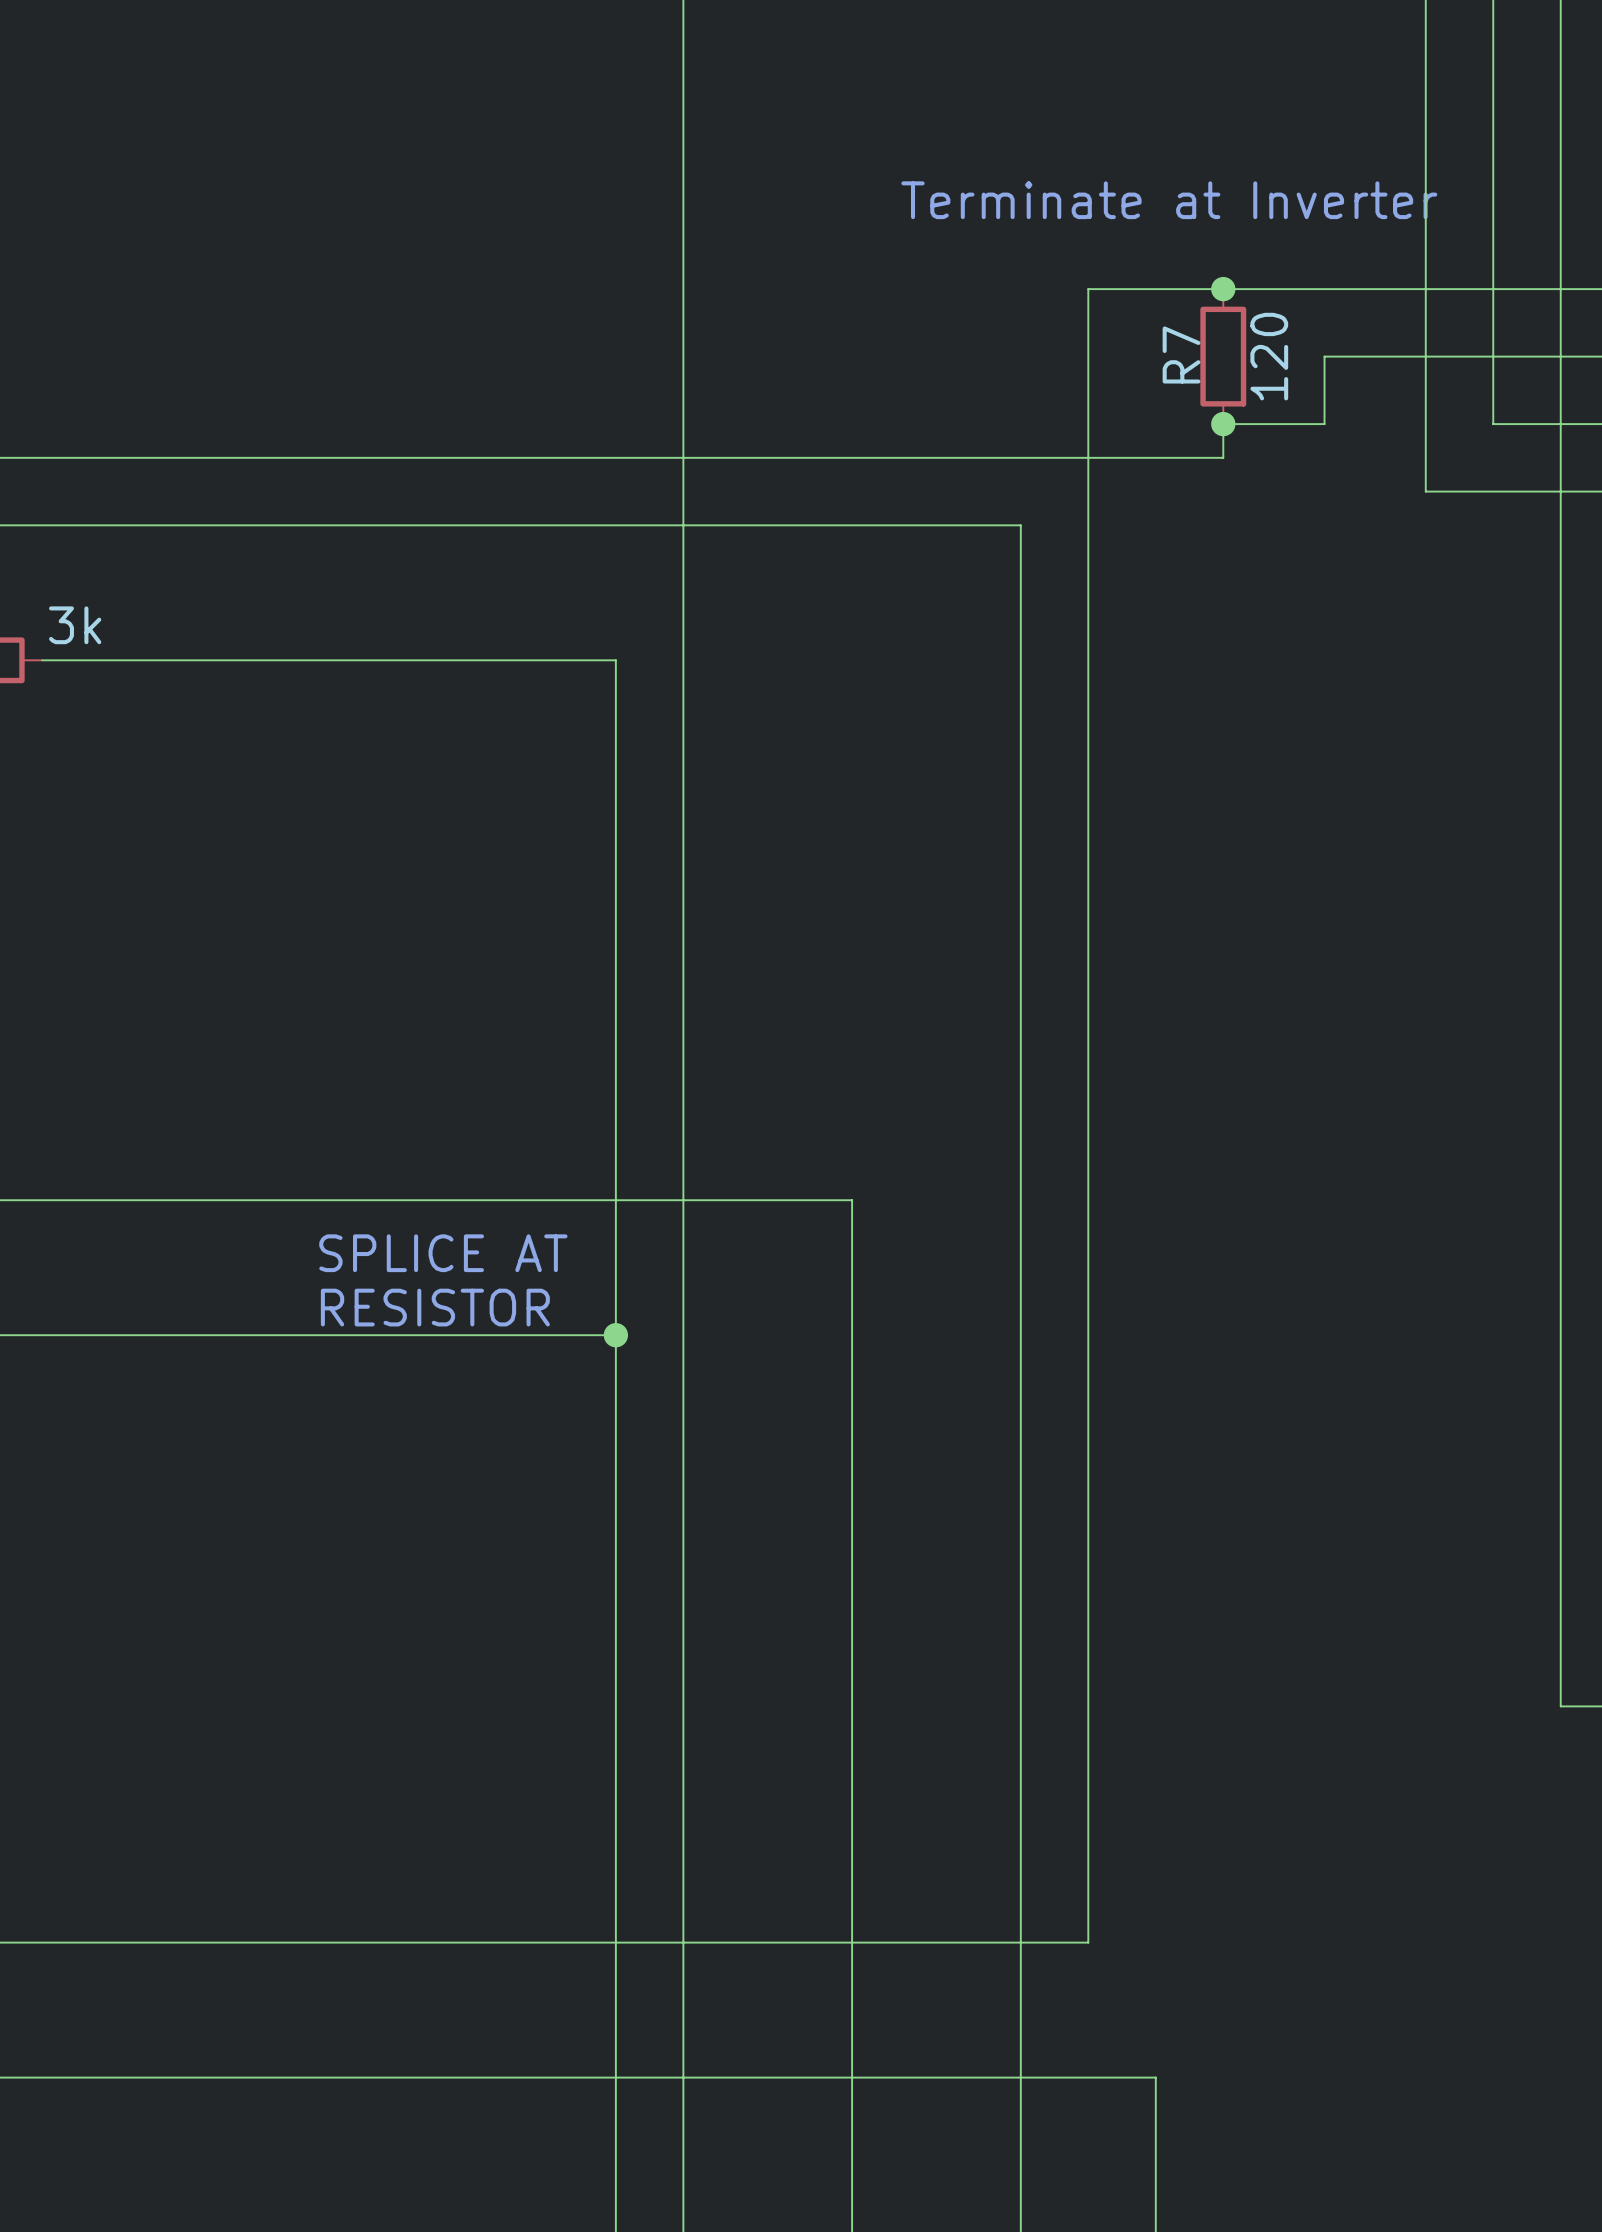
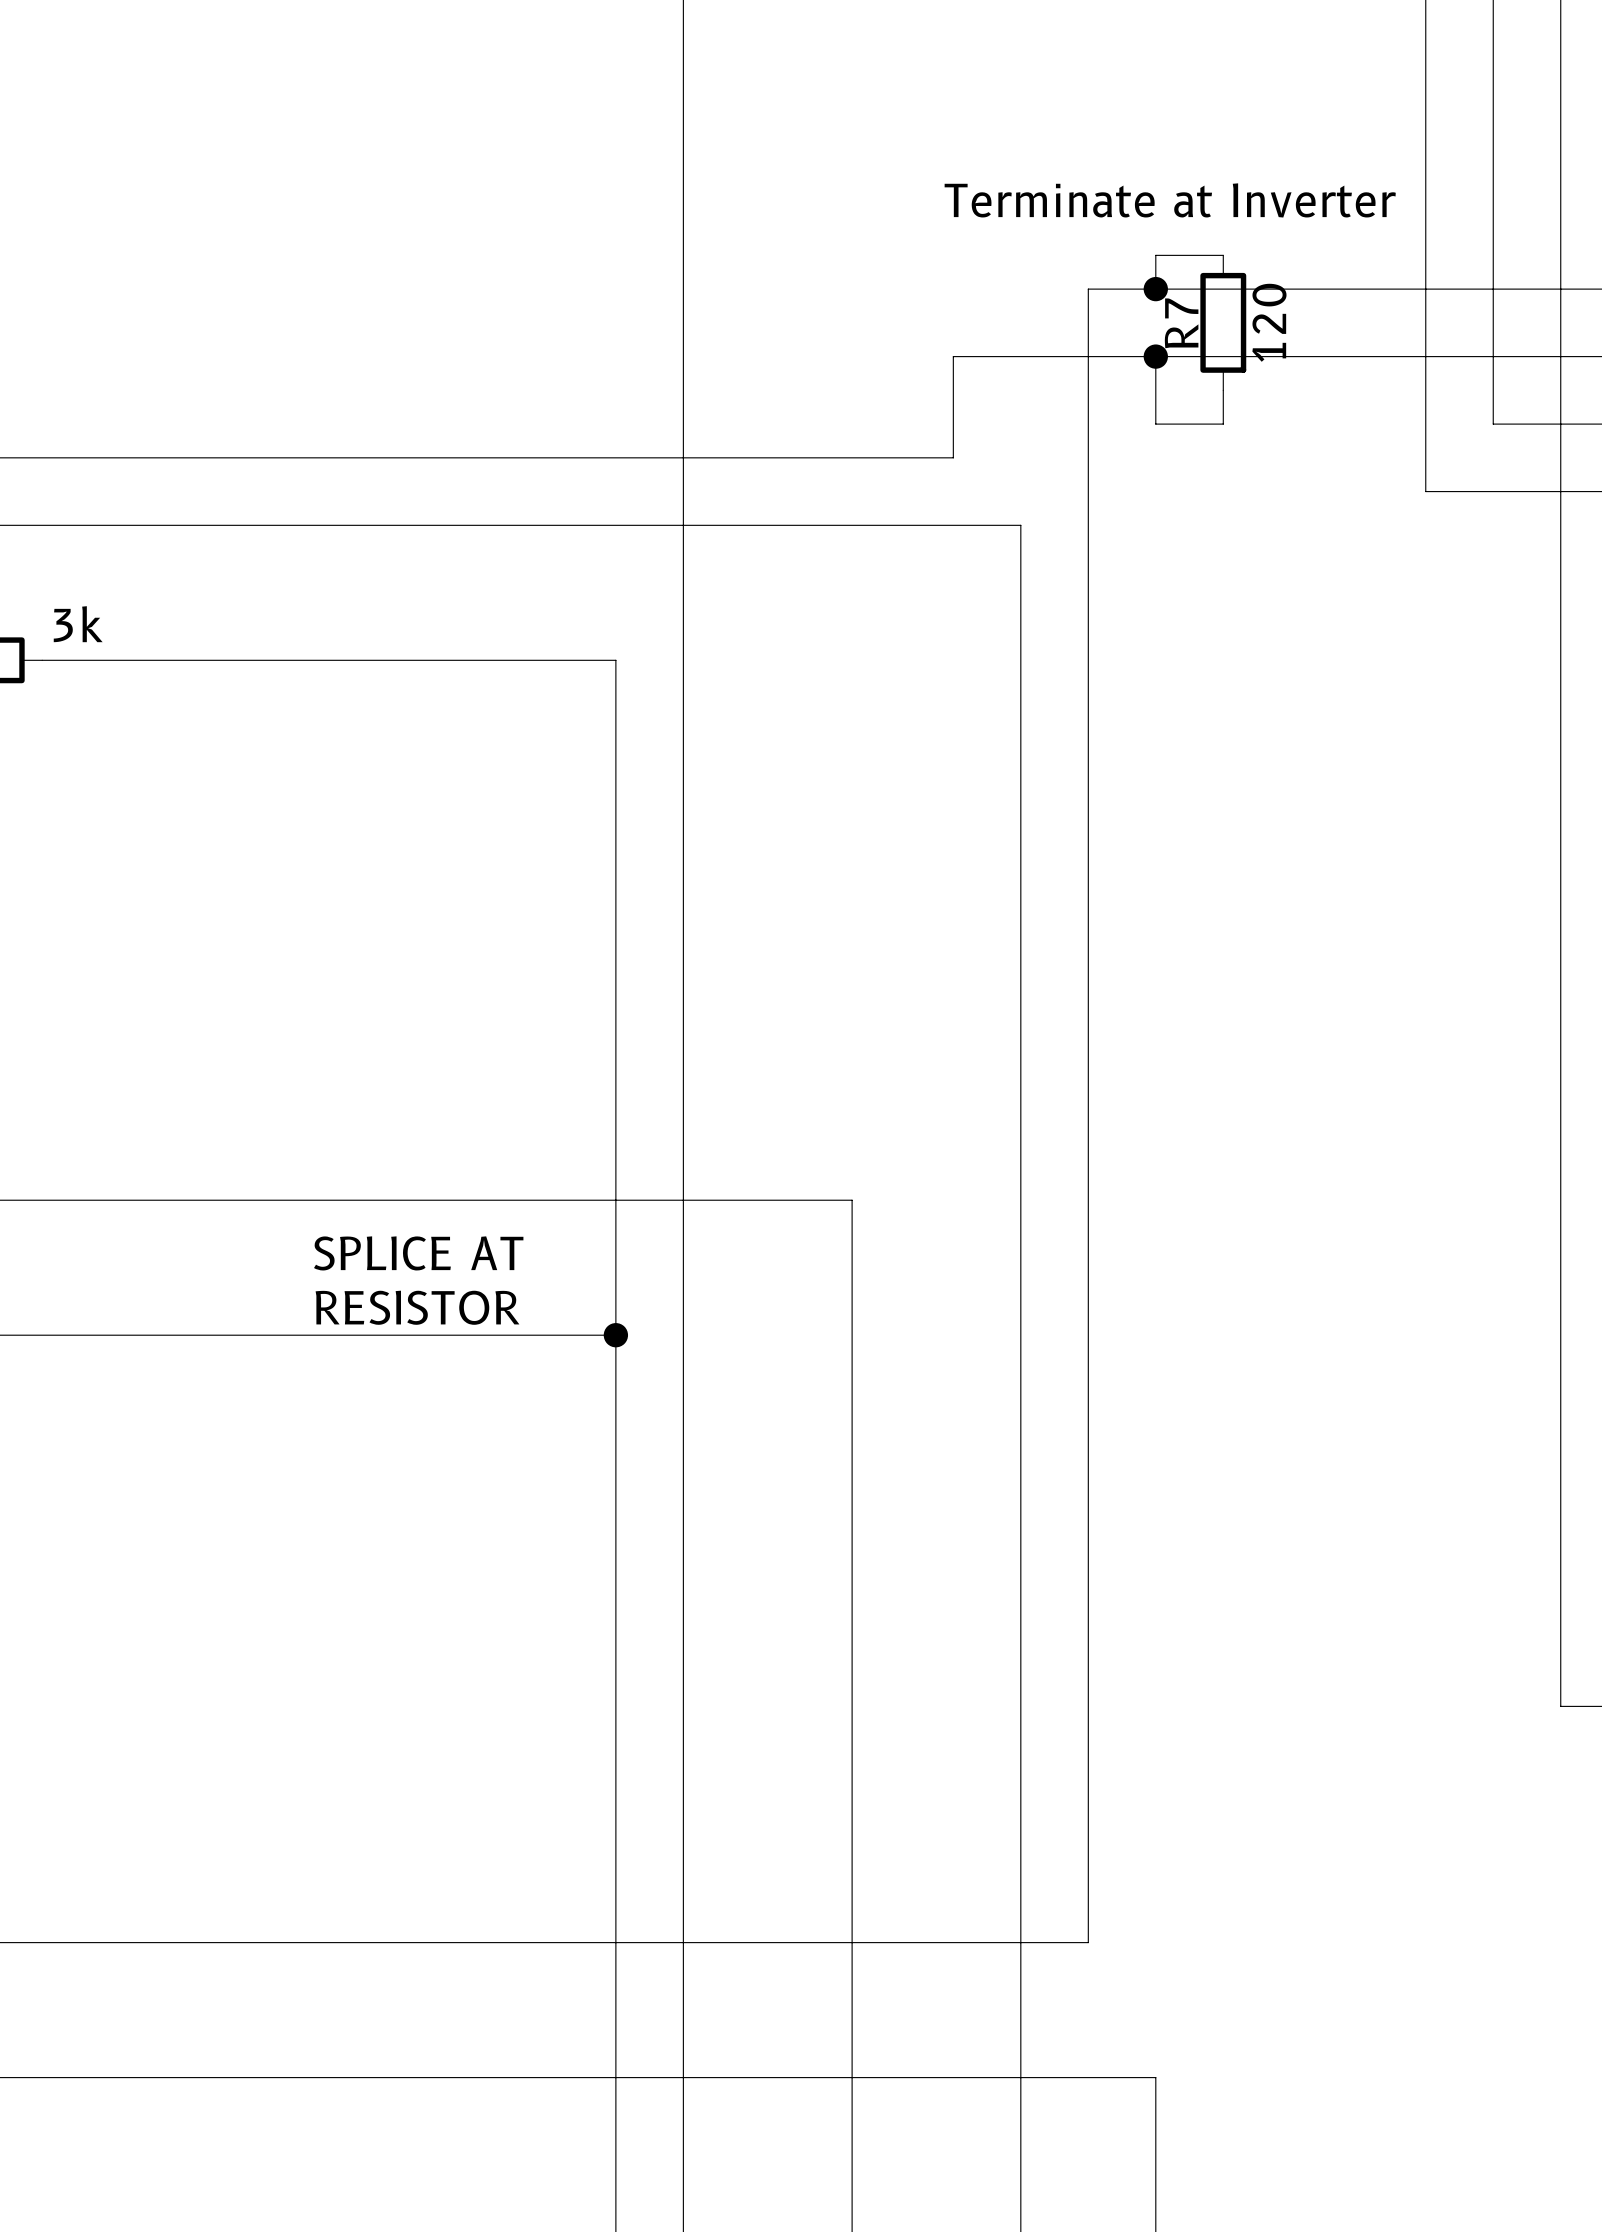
wire: none -> (1223, 255) (1155, 255) (1155, 289)
junction: none -> (1155, 289)
junction: (1223, 289) -> none
wire: none -> (1155, 356) (1155, 424) (1223, 424) (1223, 390)
junction: none -> (1155, 356)
R7 position: (1223, 356) -> (1223, 322)
wire: (1324, 356) (1324, 424) (1223, 424) (1223, 457) (953, 457) -> (1324, 356) (953, 356) (953, 457)
junction: (1223, 424) -> none

